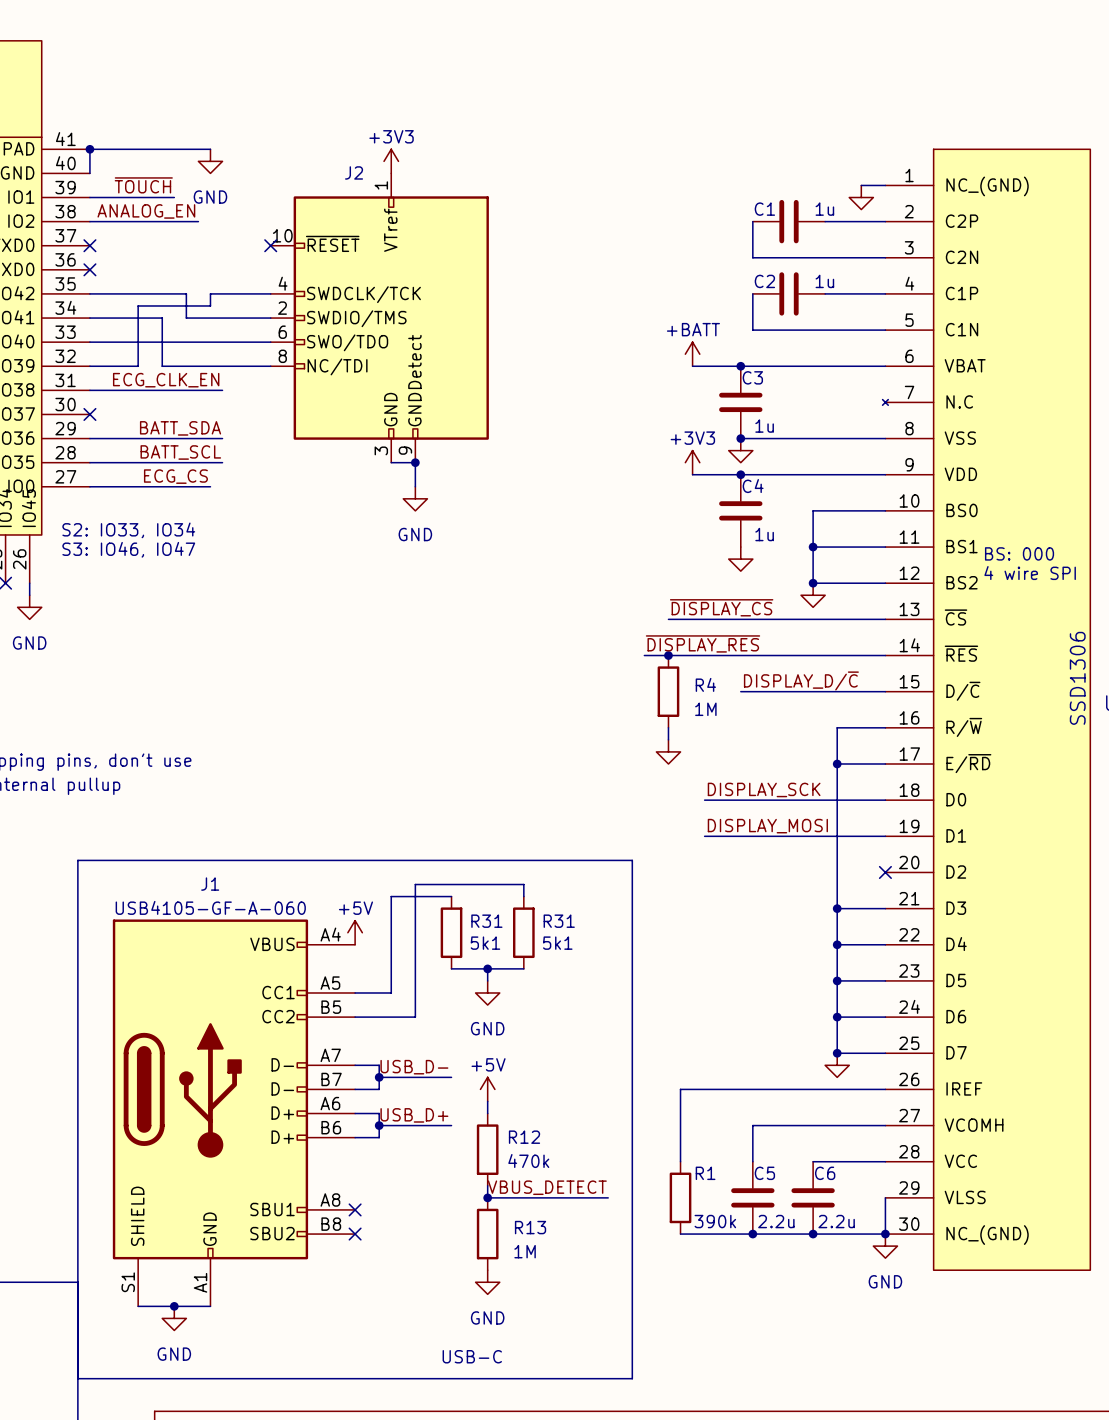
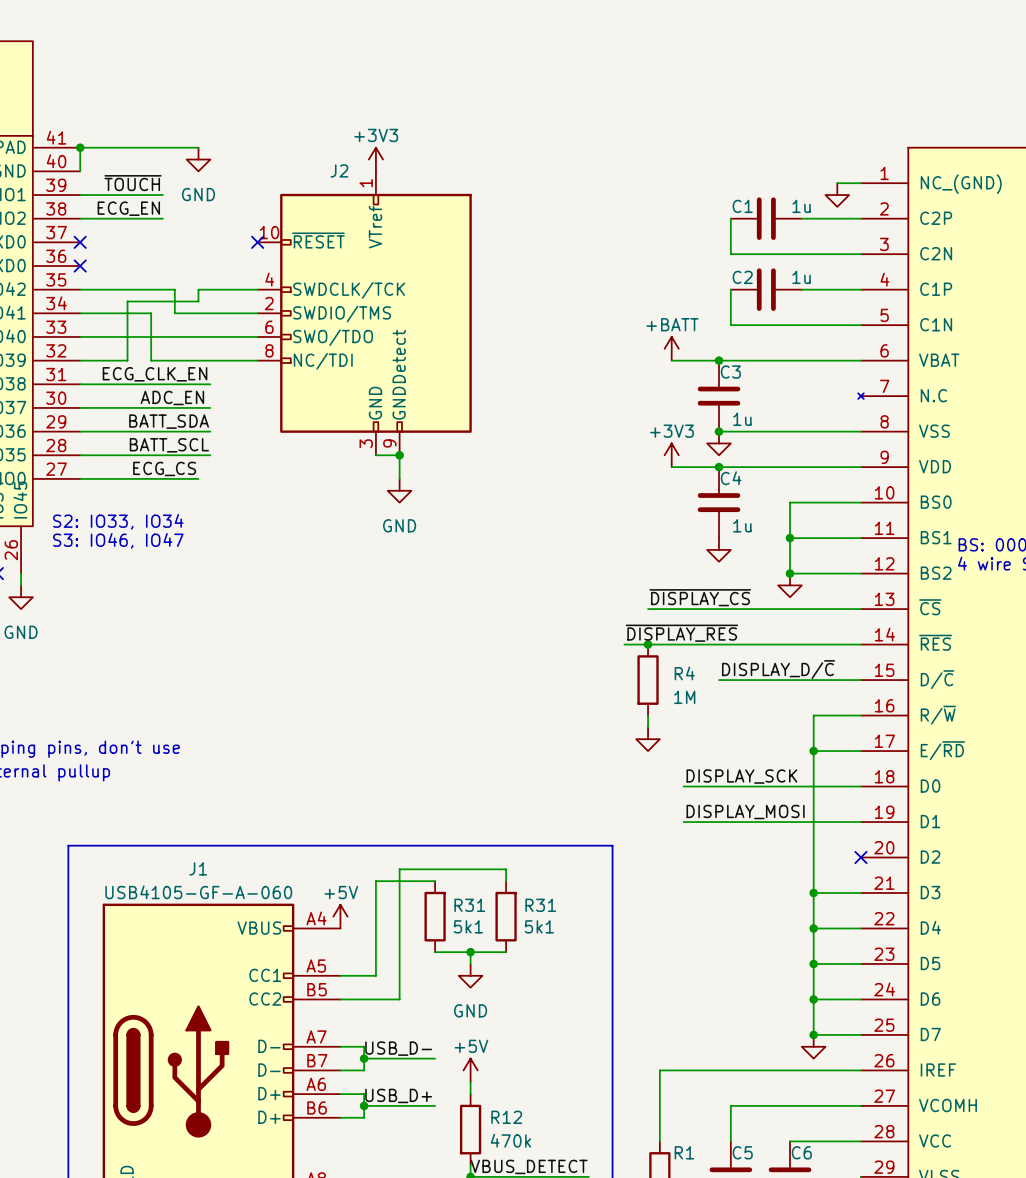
label: none -> ECG_EN (128, 208)
label: ANALOG_EN (146, 211) -> none
wire: (174, 221) (198, 221) -> none
label: none -> ADC_EN (172, 397)
wire: none -> (80, 407) (210, 407)
no-connect mark: (89, 414) -> none

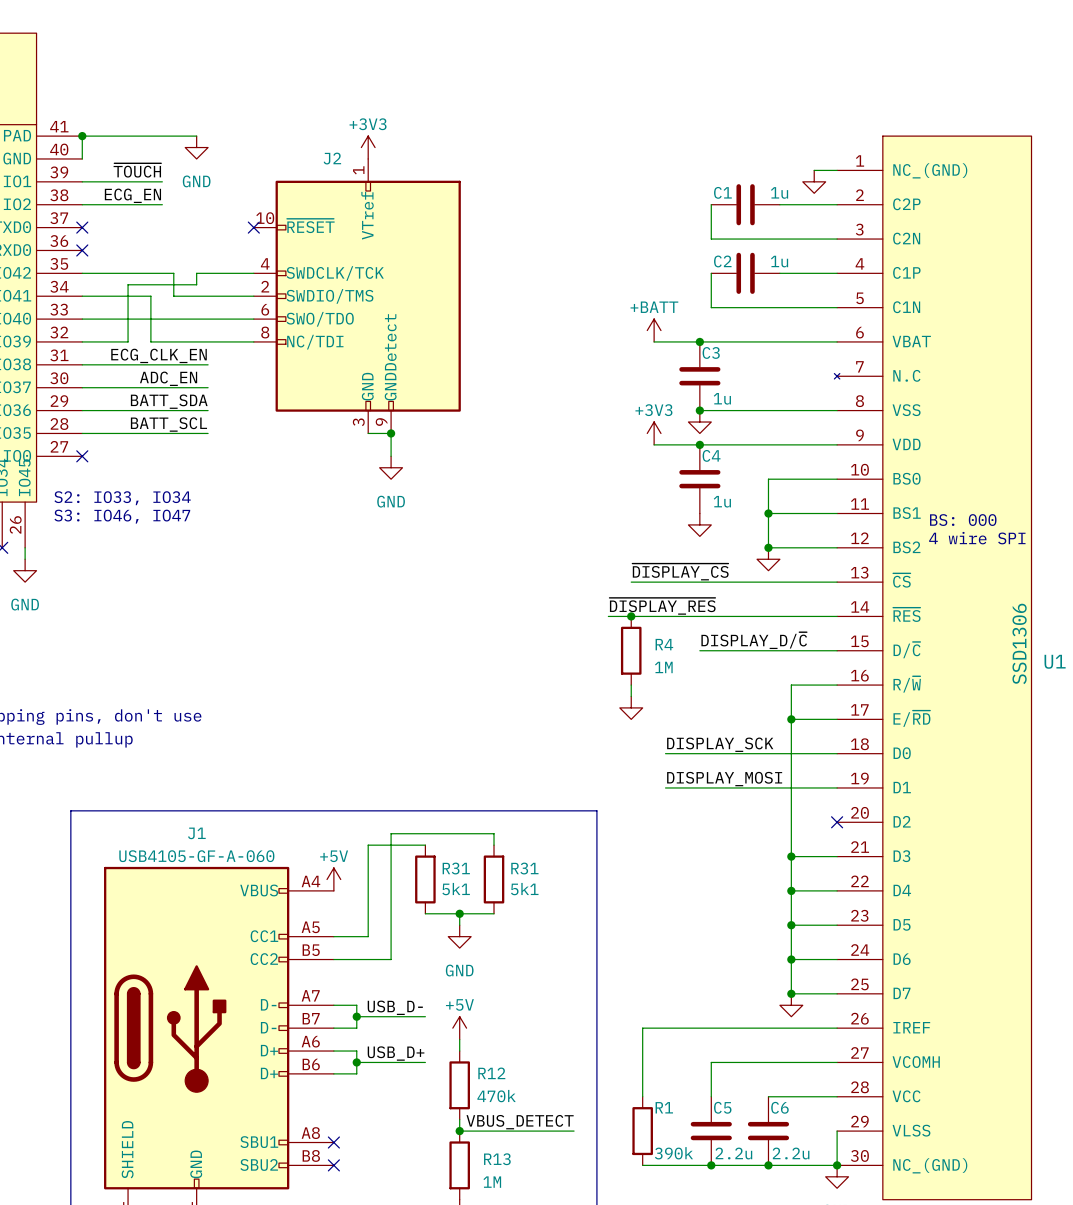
label: ECG_CS (164, 468) -> none
wire: (80, 478) (198, 478) -> none
no-connect mark: none -> (82, 456)

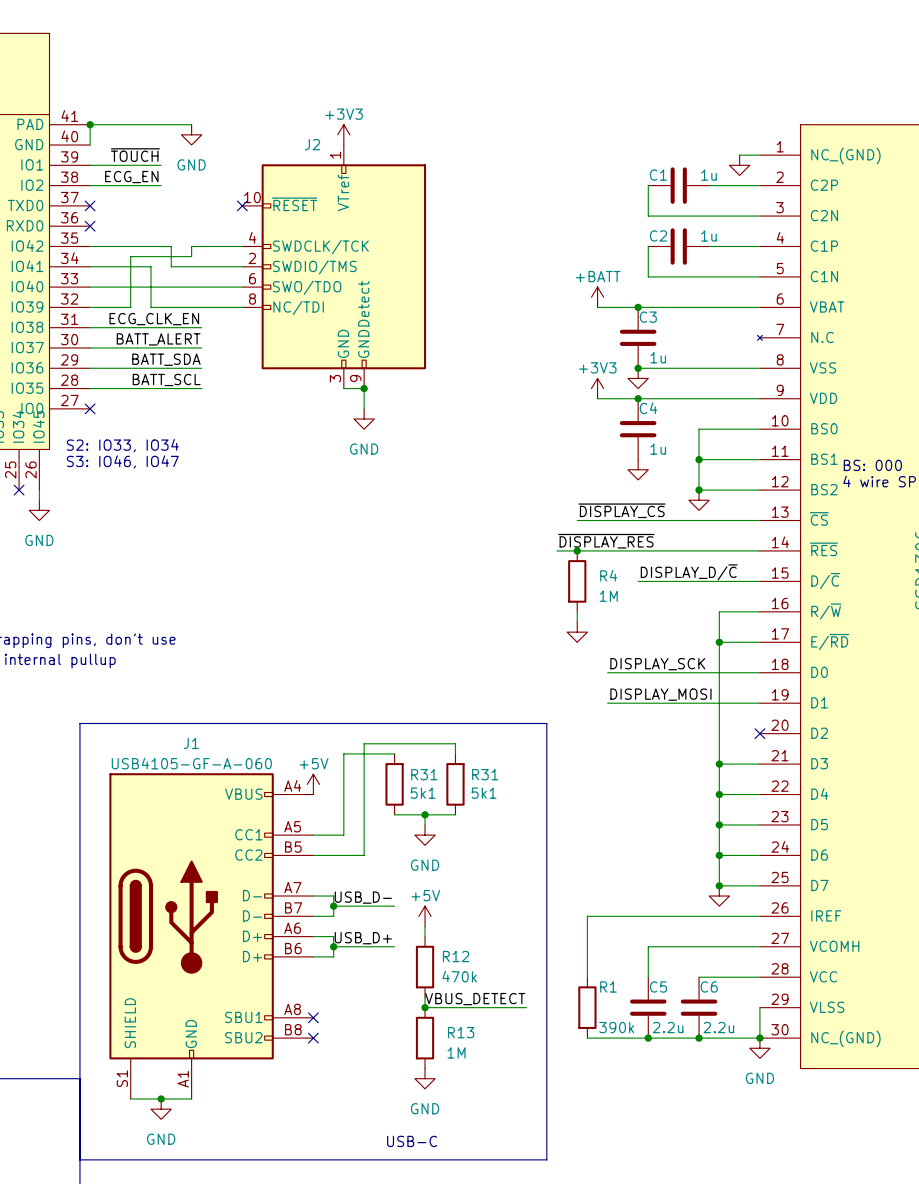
label: none -> BATT_ALERT (158, 339)
label: ADC_EN (168, 378) -> none

